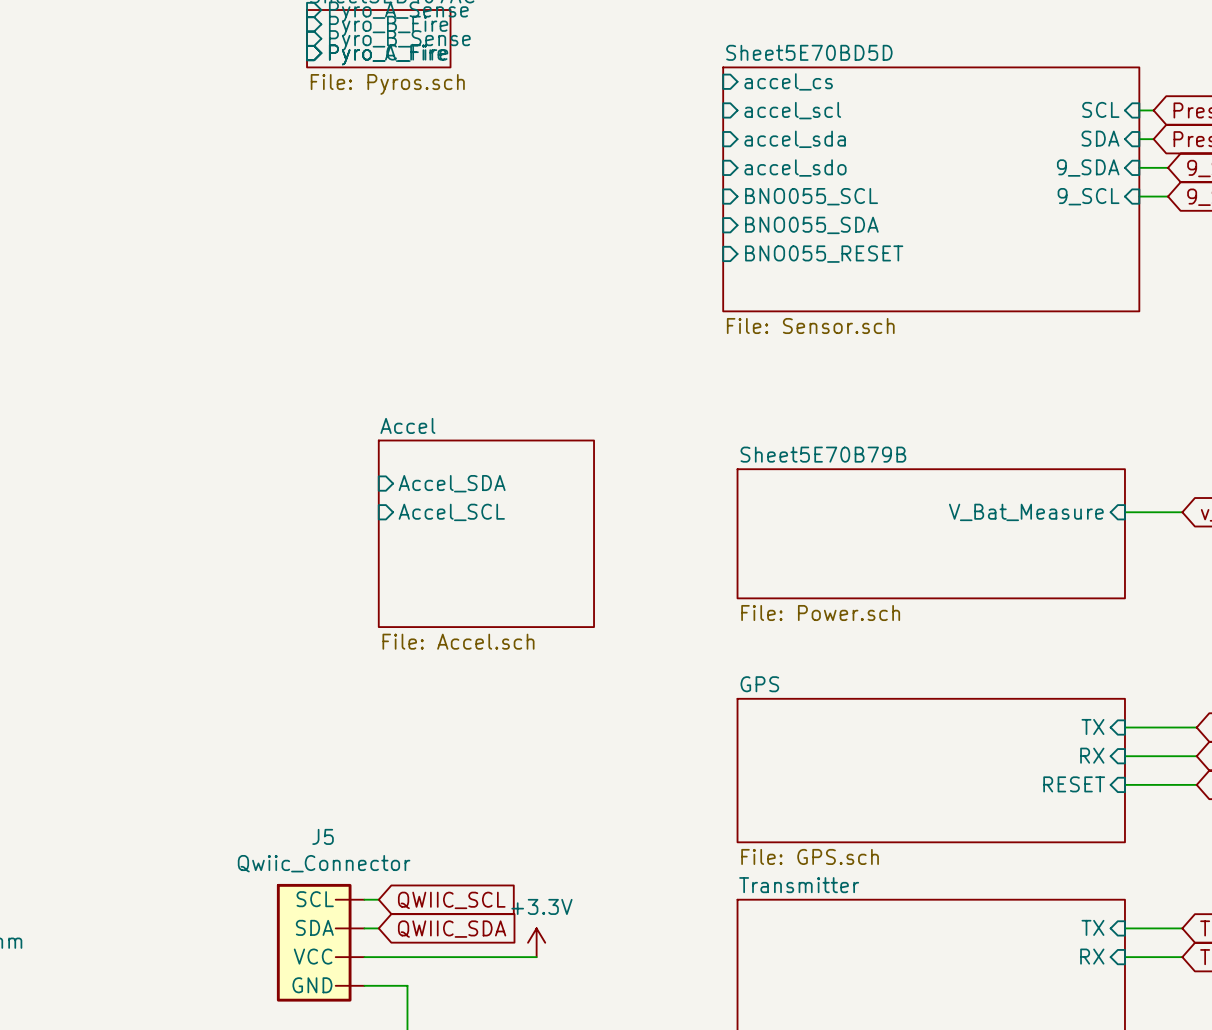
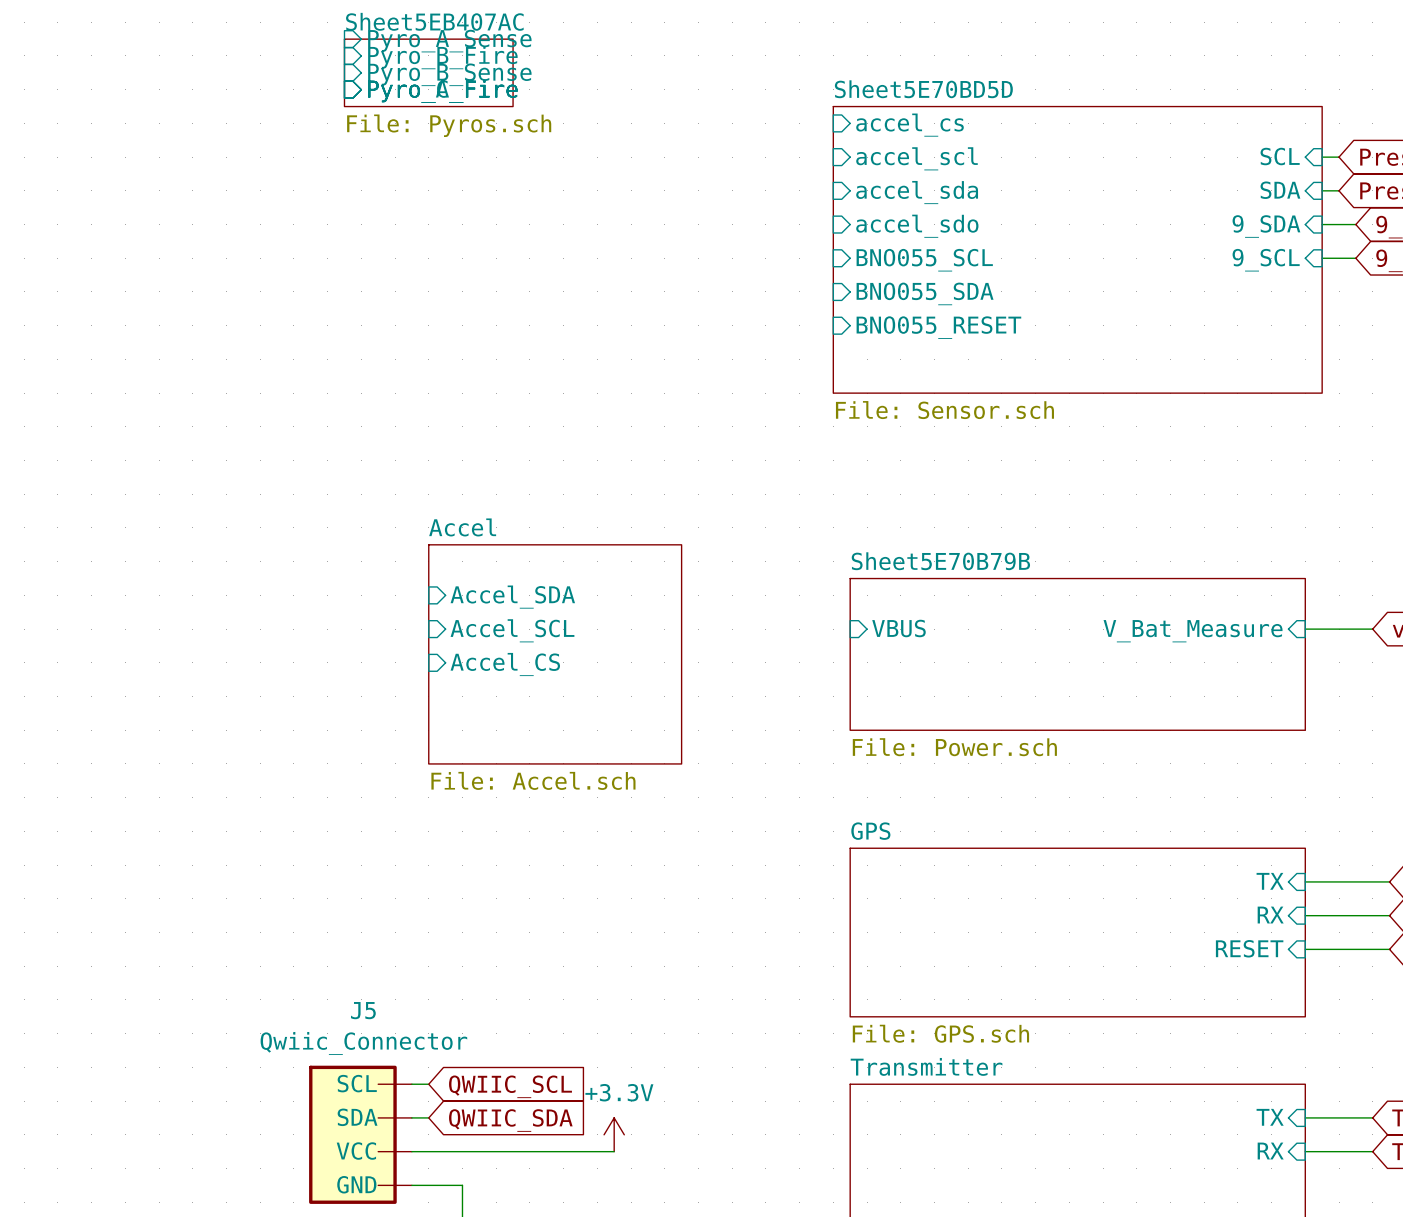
sheet pin: none -> VBUS (898, 628)
sheet pin: none -> Accel_CS (505, 664)

